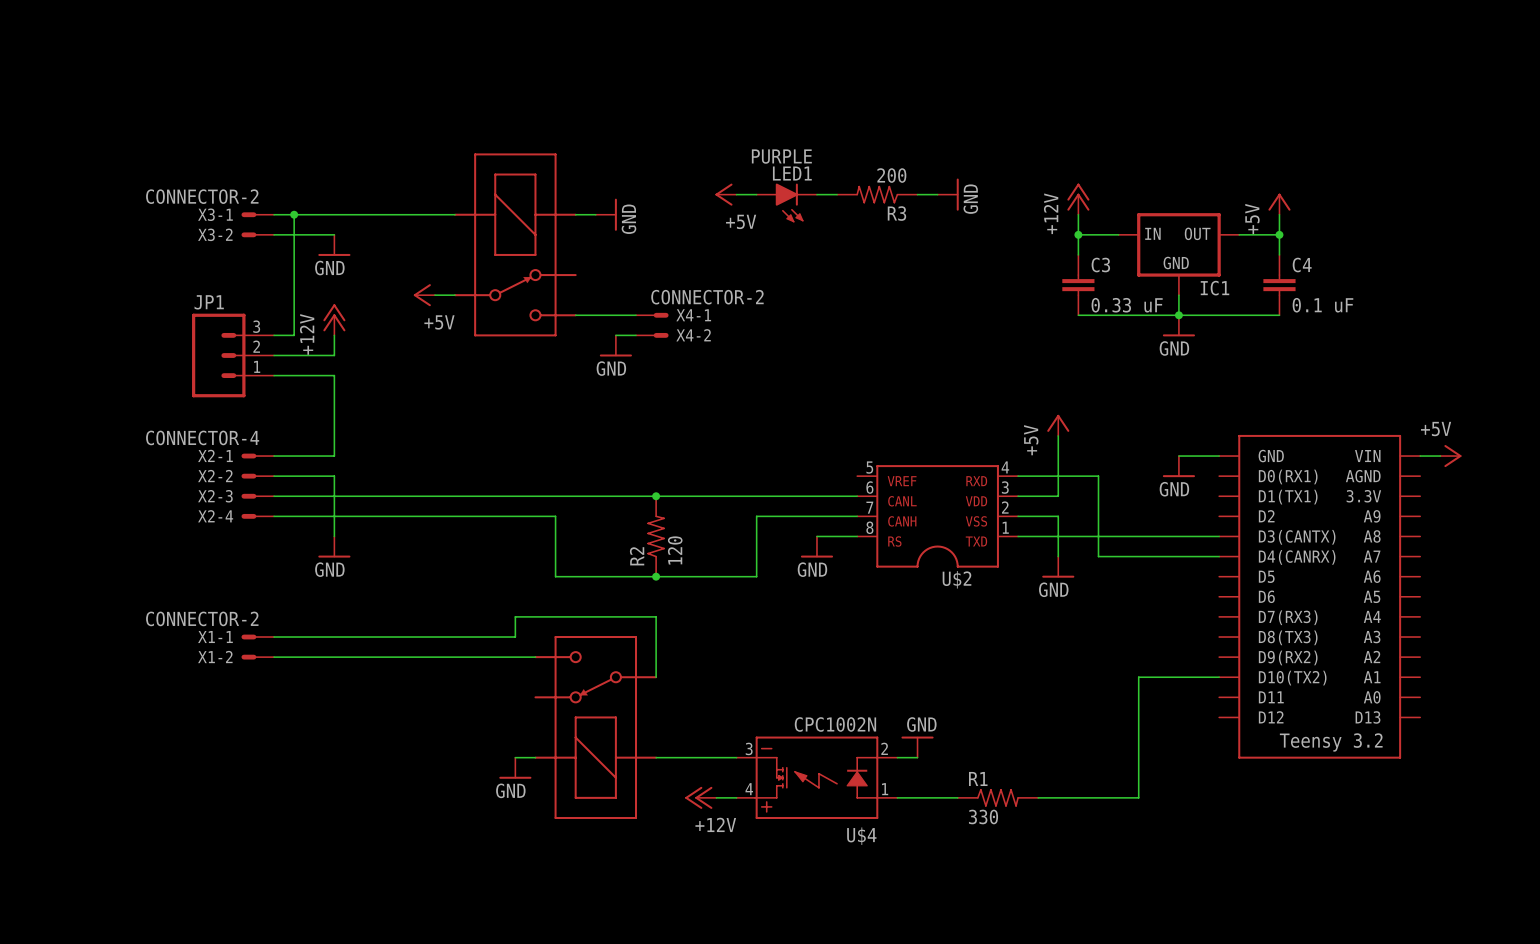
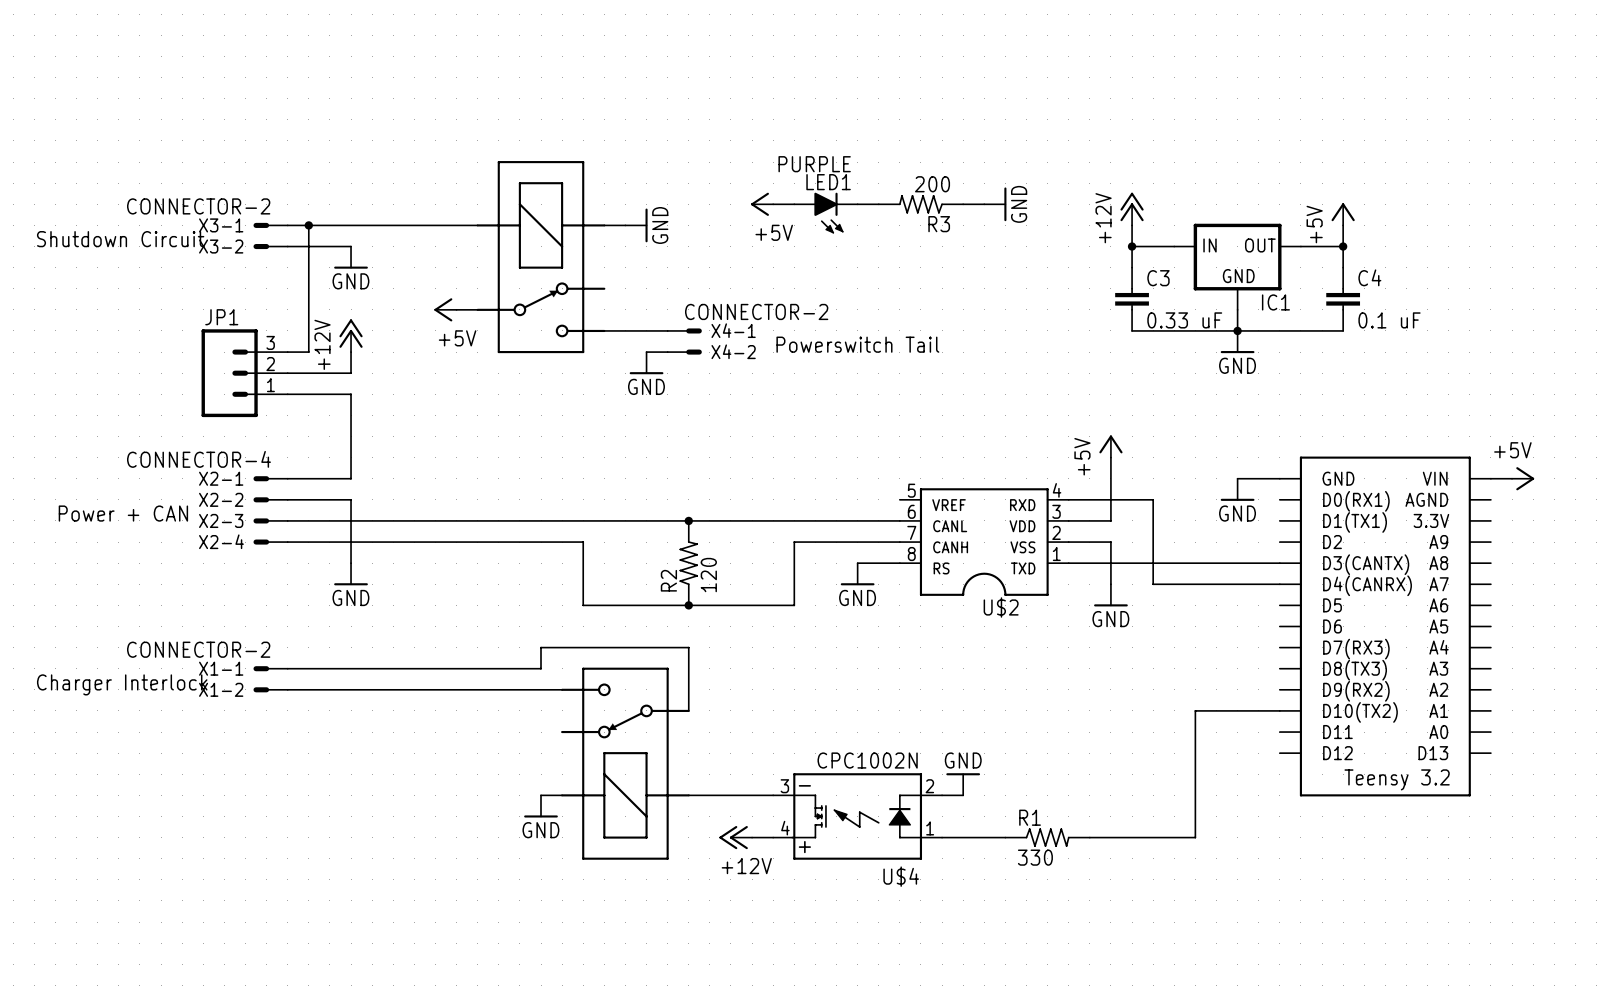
text: none -> Shutdown Circuit (120, 239)
text: none -> Powerswitch Tail (857, 344)
text: none -> Power + CAN (123, 513)
text: none -> Charger Interlock (122, 684)

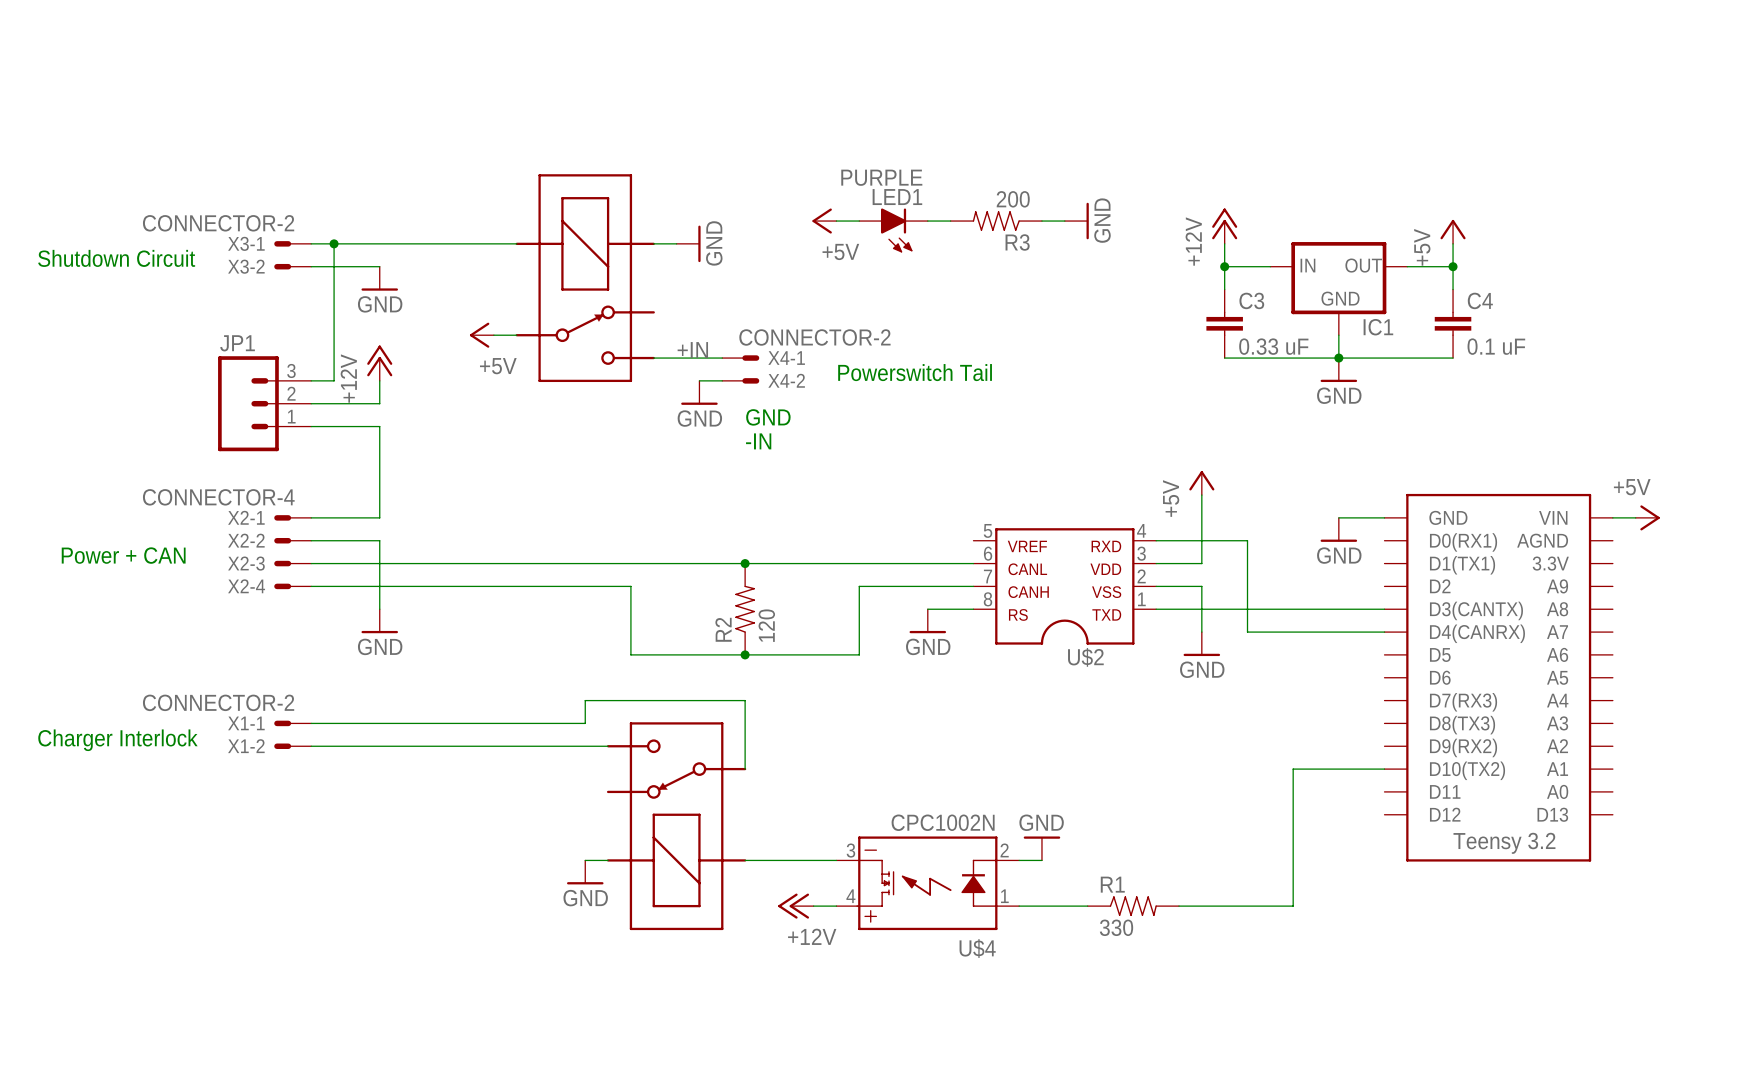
label: none -> +IN (692, 350)
text: none -> GND (768, 417)
text: none -> -IN (758, 441)

